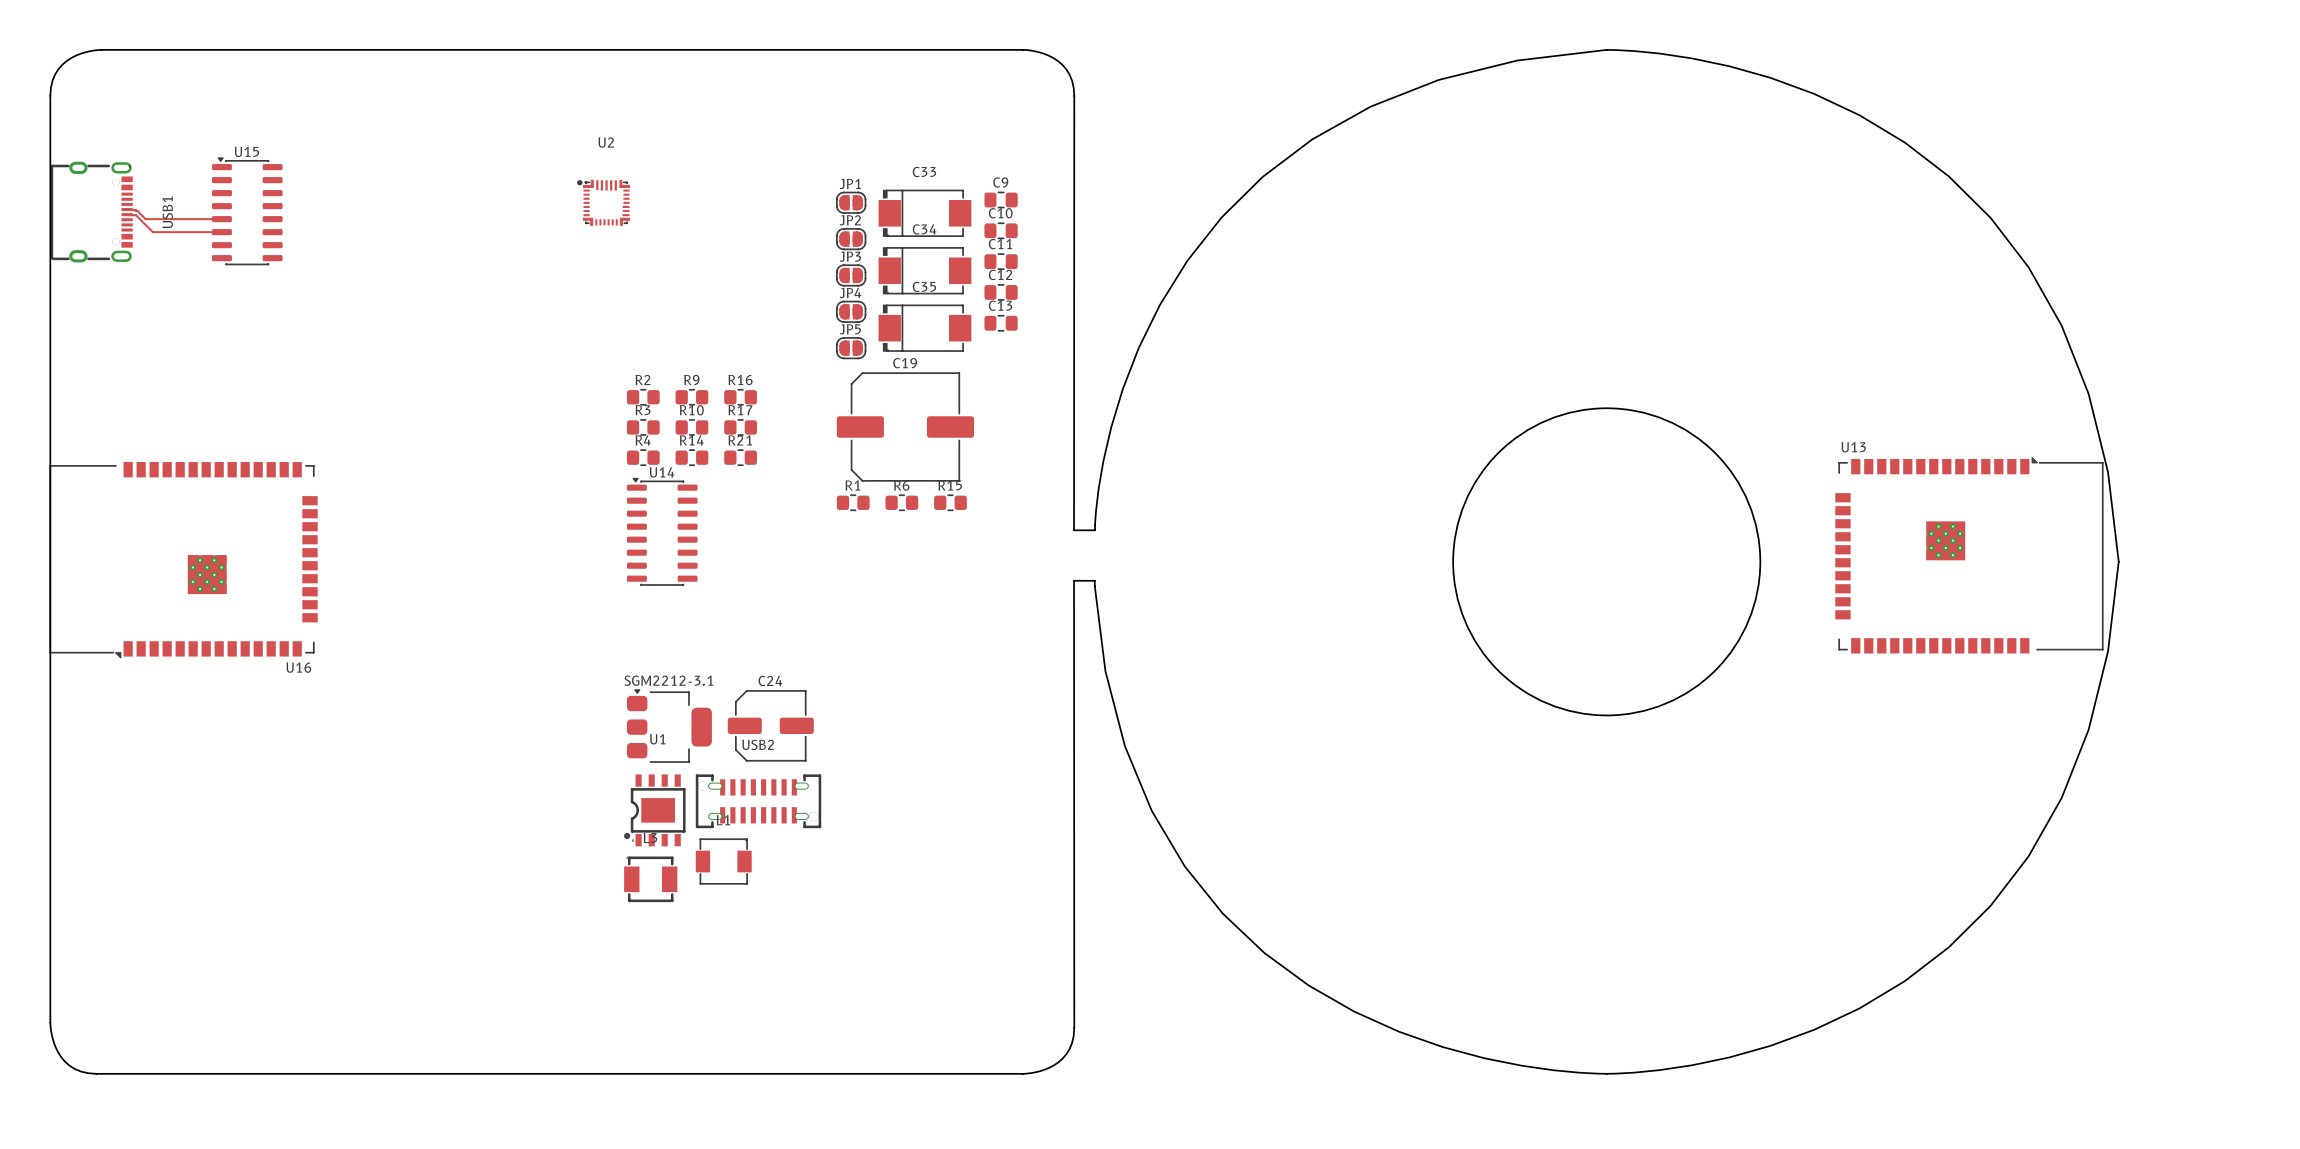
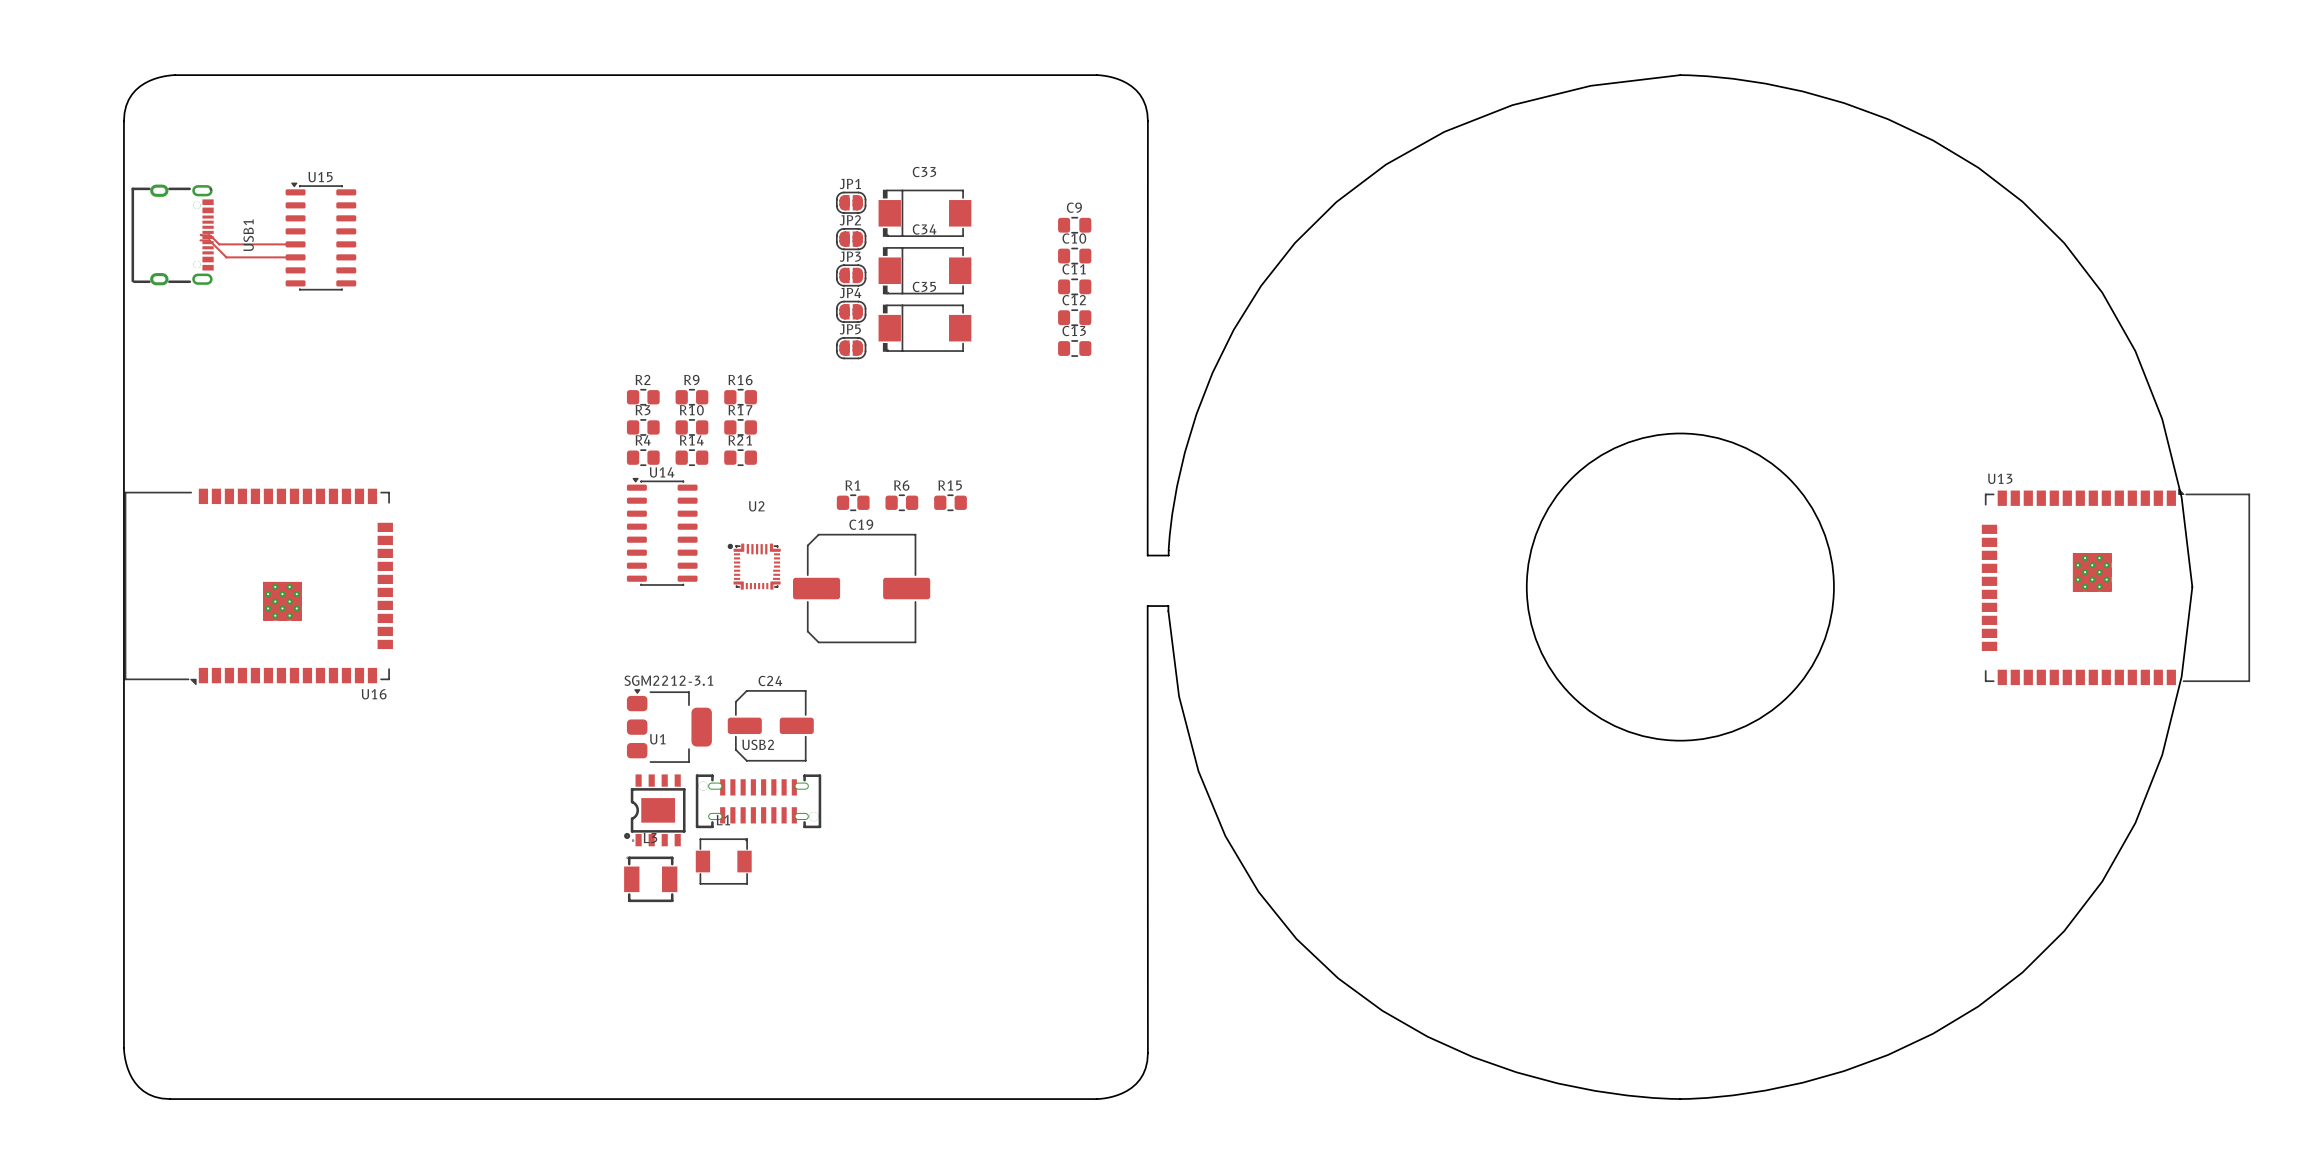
board edge: (101, 49) (1023, 49) (1048, 55) (1066, 69) (1072, 80) (1074, 95) (1074, 530) (1095, 530) (1098, 489) (1111, 427) (1122, 389) (1138, 347) (1160, 304) (1187, 260) (1221, 217) (1262, 176) (1312, 139) (1370, 106) (1438, 79) (1517, 60) (1606, 49) (1633, 51) (1691, 58) (1770, 77) (1814, 93) (1859, 115) (1904, 142) (1948, 176) (1990, 217) (2028, 267) (2061, 325) (2088, 393) (2108, 472) (2118, 561) (2108, 651) (2088, 729) (2061, 797) (2028, 856) (1990, 905) (1948, 947) (1904, 981) (1859, 1008) (1814, 1029) (1770, 1045) (1691, 1065) (1659, 1070) (1606, 1073) (1553, 1070) (1521, 1065) (1443, 1047) (1399, 1031) (1354, 1011) (1308, 985) (1264, 953) (1222, 913) (1184, 866) (1151, 810) (1124, 745) (1105, 671) (1094, 580) (1074, 580) (1074, 1027) (1072, 1042) (1066, 1054) (1048, 1068) (1023, 1073) (96, 1073) (81, 1071) (69, 1065) (58, 1053) (52, 1038) (50, 1023) (50, 95) (52, 80) (62, 64) (80, 53) (101, 49) -> (175, 75) (1096, 75) (1122, 80) (1139, 94) (1145, 105) (1147, 121) (1147, 555) (1168, 555) (1172, 514) (1184, 452) (1196, 414) (1212, 373) (1233, 329) (1261, 286) (1294, 243) (1336, 202) (1385, 164) (1444, 131) (1512, 105) (1590, 85) (1680, 75) (1707, 76) (1765, 83) (1844, 103) (1887, 119) (1933, 140) (1978, 167) (2022, 201) (2064, 243) (2102, 292) (2135, 351) (2162, 419) (2181, 497) (2192, 587) (2181, 676) (2162, 755) (2135, 823) (2102, 881) (2064, 931) (2022, 972) (1978, 1006) (1933, 1033) (1887, 1055) (1844, 1071) (1765, 1090) (1733, 1095) (1680, 1099) (1627, 1095) (1595, 1090) (1516, 1072) (1472, 1057) (1427, 1036) (1382, 1010) (1338, 978) (1296, 938) (1258, 891) (1225, 836) (1198, 771) (1179, 696) (1168, 606) (1147, 606) (1147, 1052) (1145, 1068) (1139, 1079) (1122, 1093) (1096, 1099) (170, 1099) (154, 1096) (143, 1091) (132, 1078) (126, 1064) (123, 1048) (123, 121) (126, 105) (135, 90) (154, 78) (175, 75)
C9 position: (1001, 199) -> (1074, 225)
U2 position: (603, 202) -> (754, 566)
track: (127, 209) (135, 210) (145, 219) (221, 219) -> (200, 234) (209, 235) (219, 244) (295, 244)
U15 position: (247, 211) -> (320, 236)
USB1 position: (91, 212) -> (172, 234)
track: (126, 215) (135, 215) (152, 232) (221, 232) -> (200, 240) (209, 240) (226, 257) (295, 257)
C10 position: (1001, 230) -> (1074, 256)
C11 position: (1001, 261) -> (1074, 286)
C12 position: (1001, 292) -> (1074, 317)
C13 position: (1001, 323) -> (1074, 348)
C19 position: (905, 427) -> (861, 588)
U13 position: (1969, 555) -> (2115, 586)
U16 position: (183, 560) -> (258, 586)
round board edge position: (1606, 561) -> (1680, 587)

